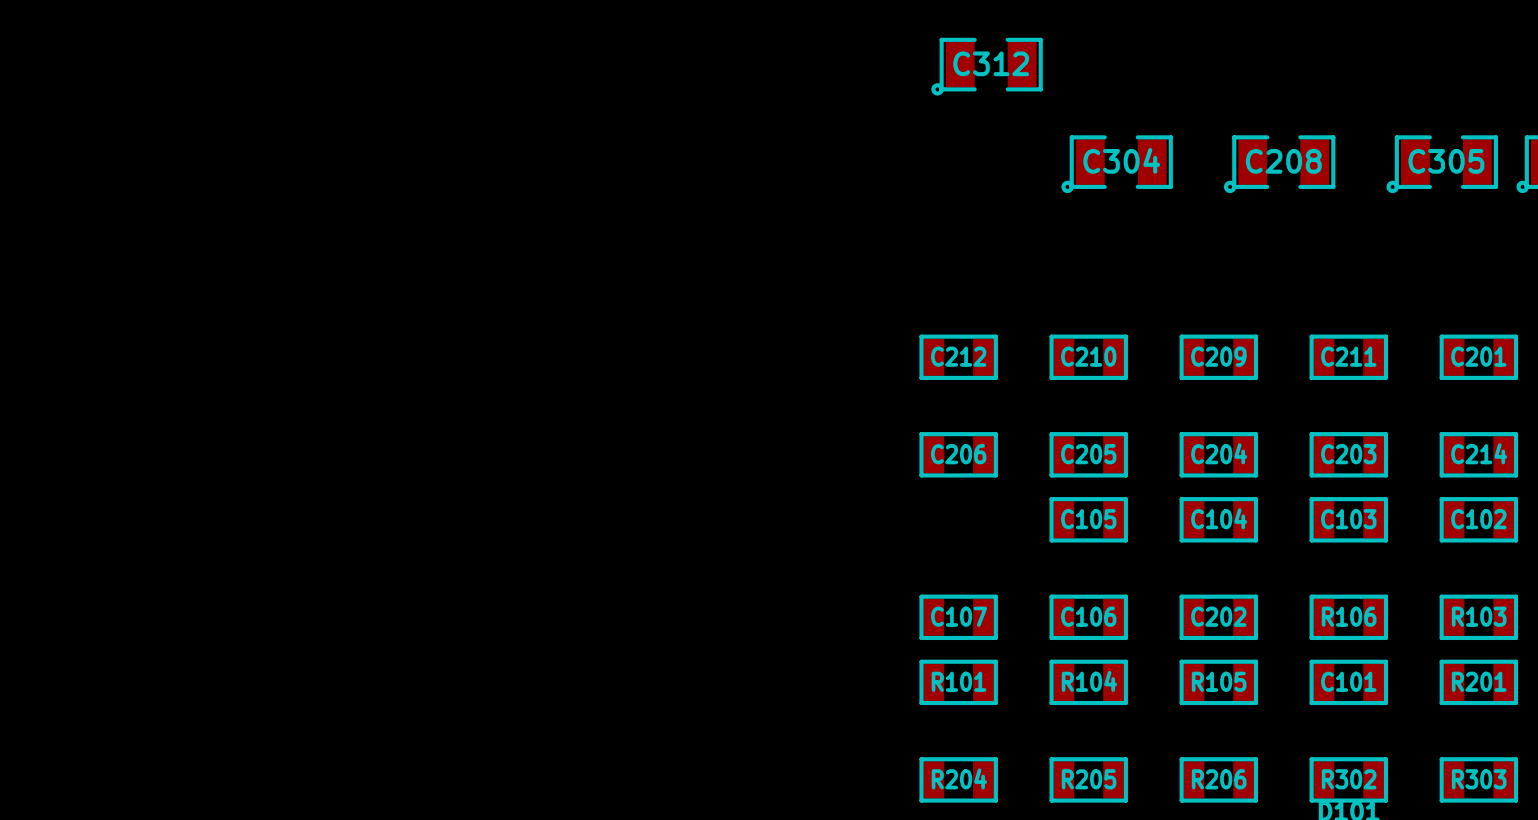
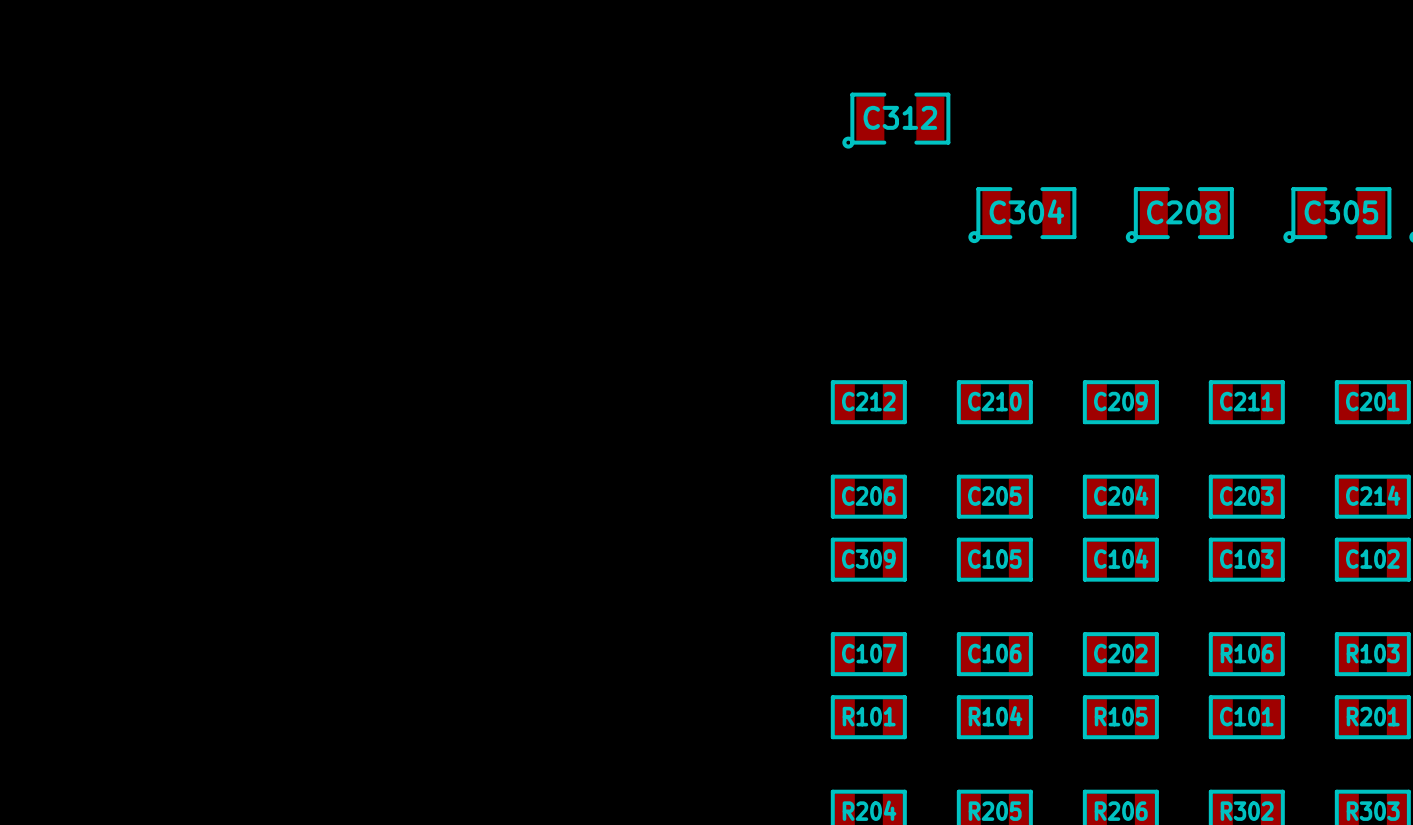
C309: none -> (868, 559)

